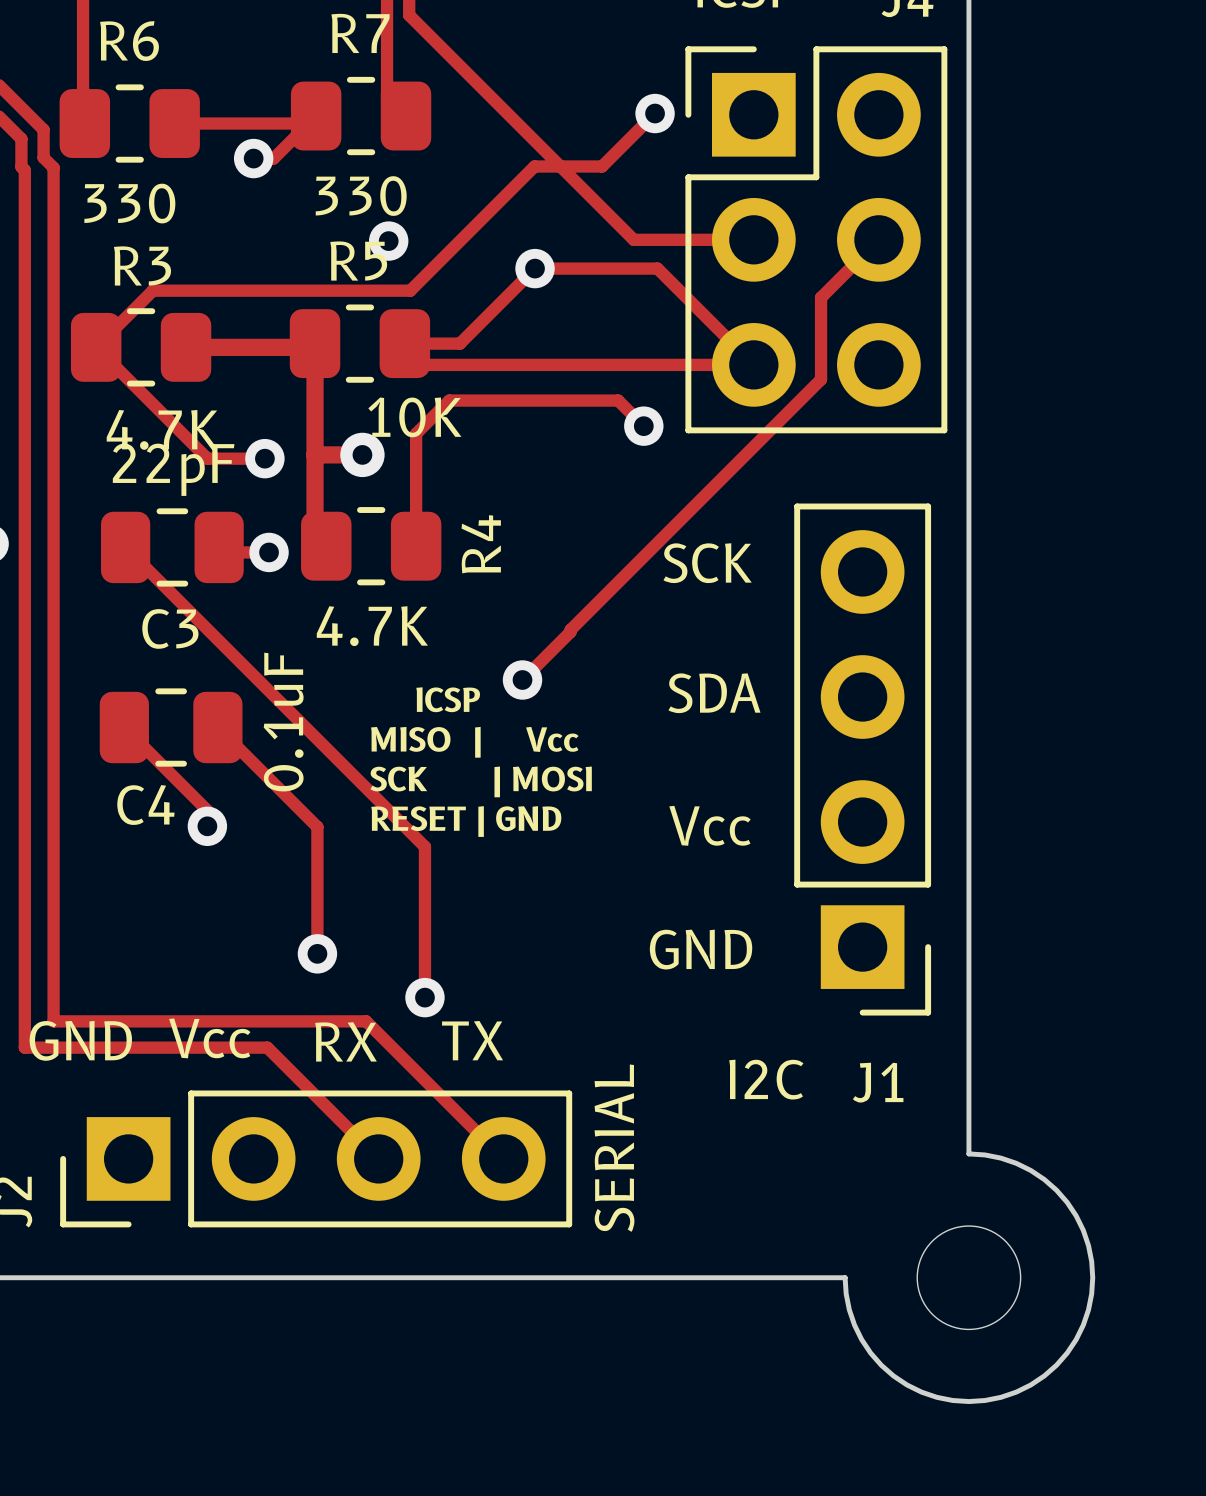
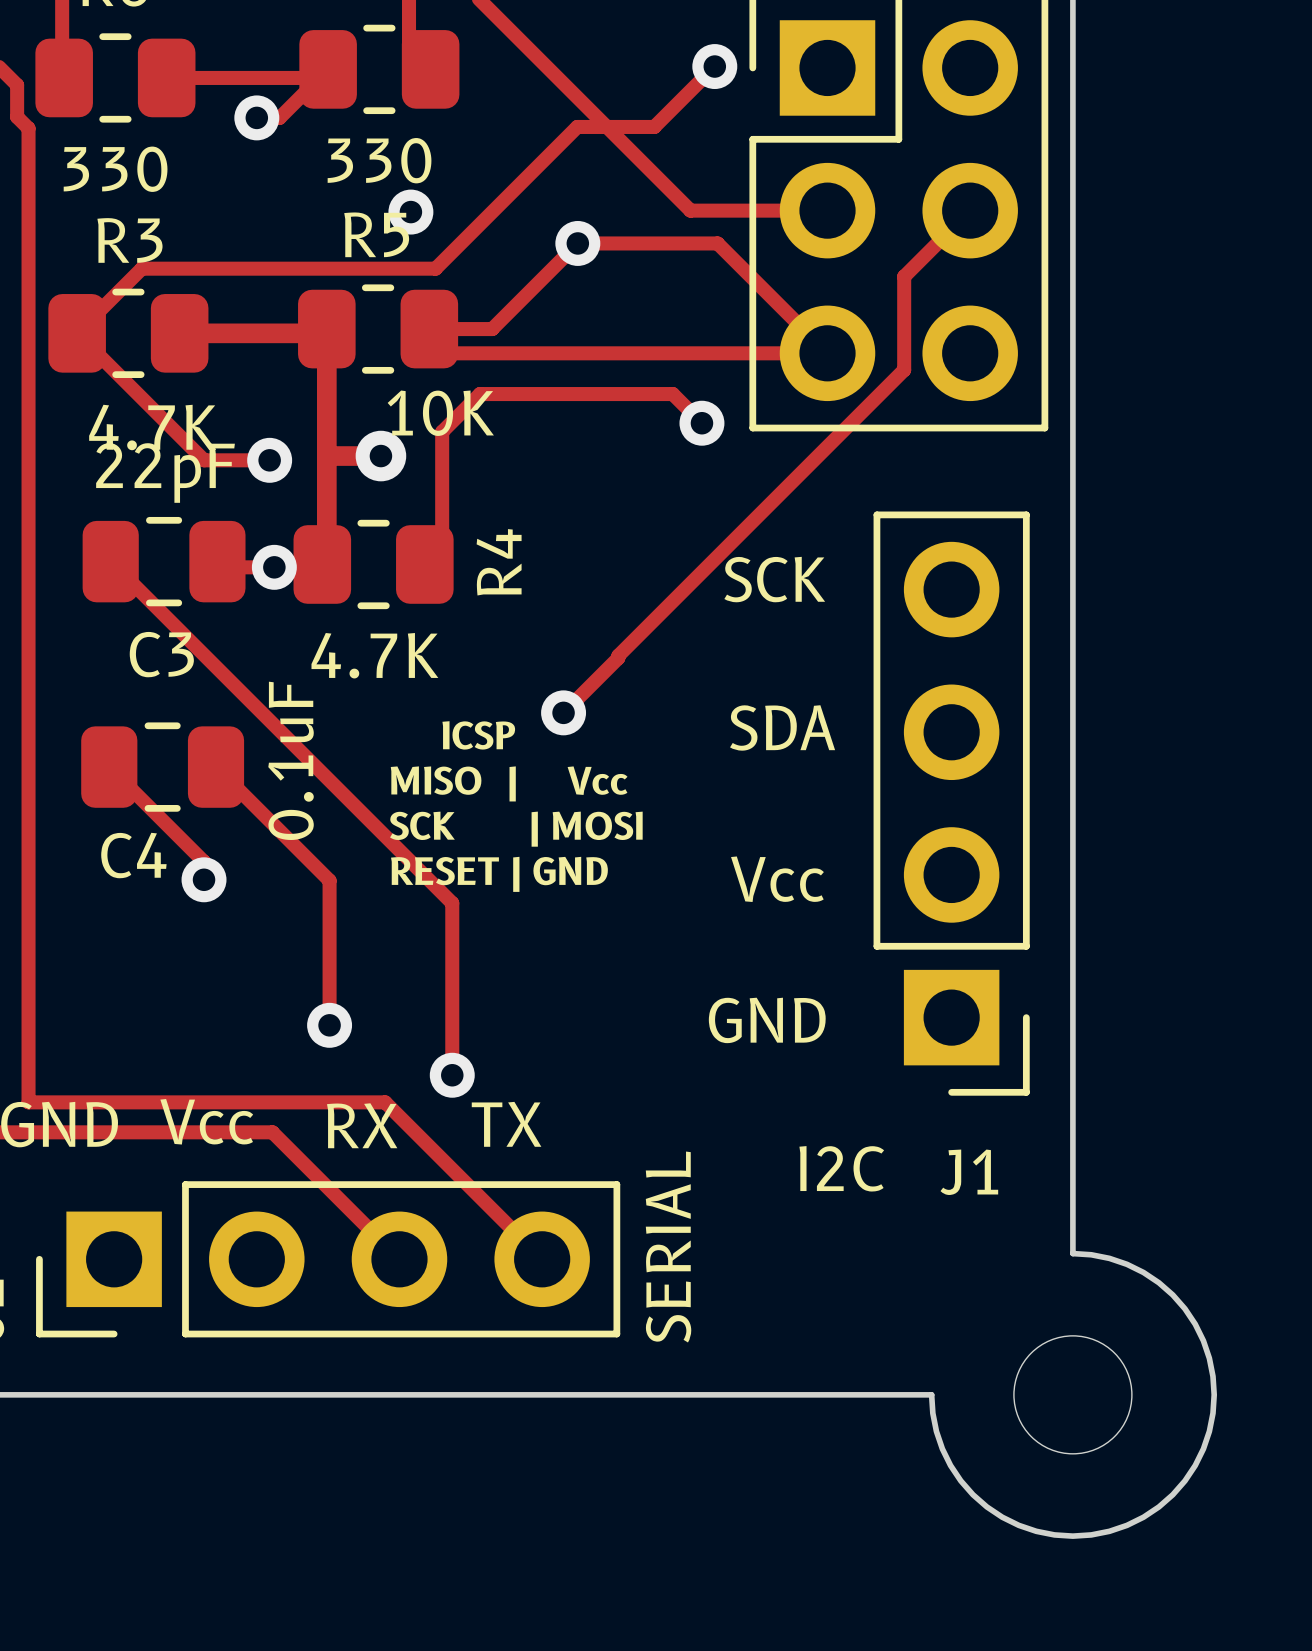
R4 position: (371, 546) -> (373, 564)

